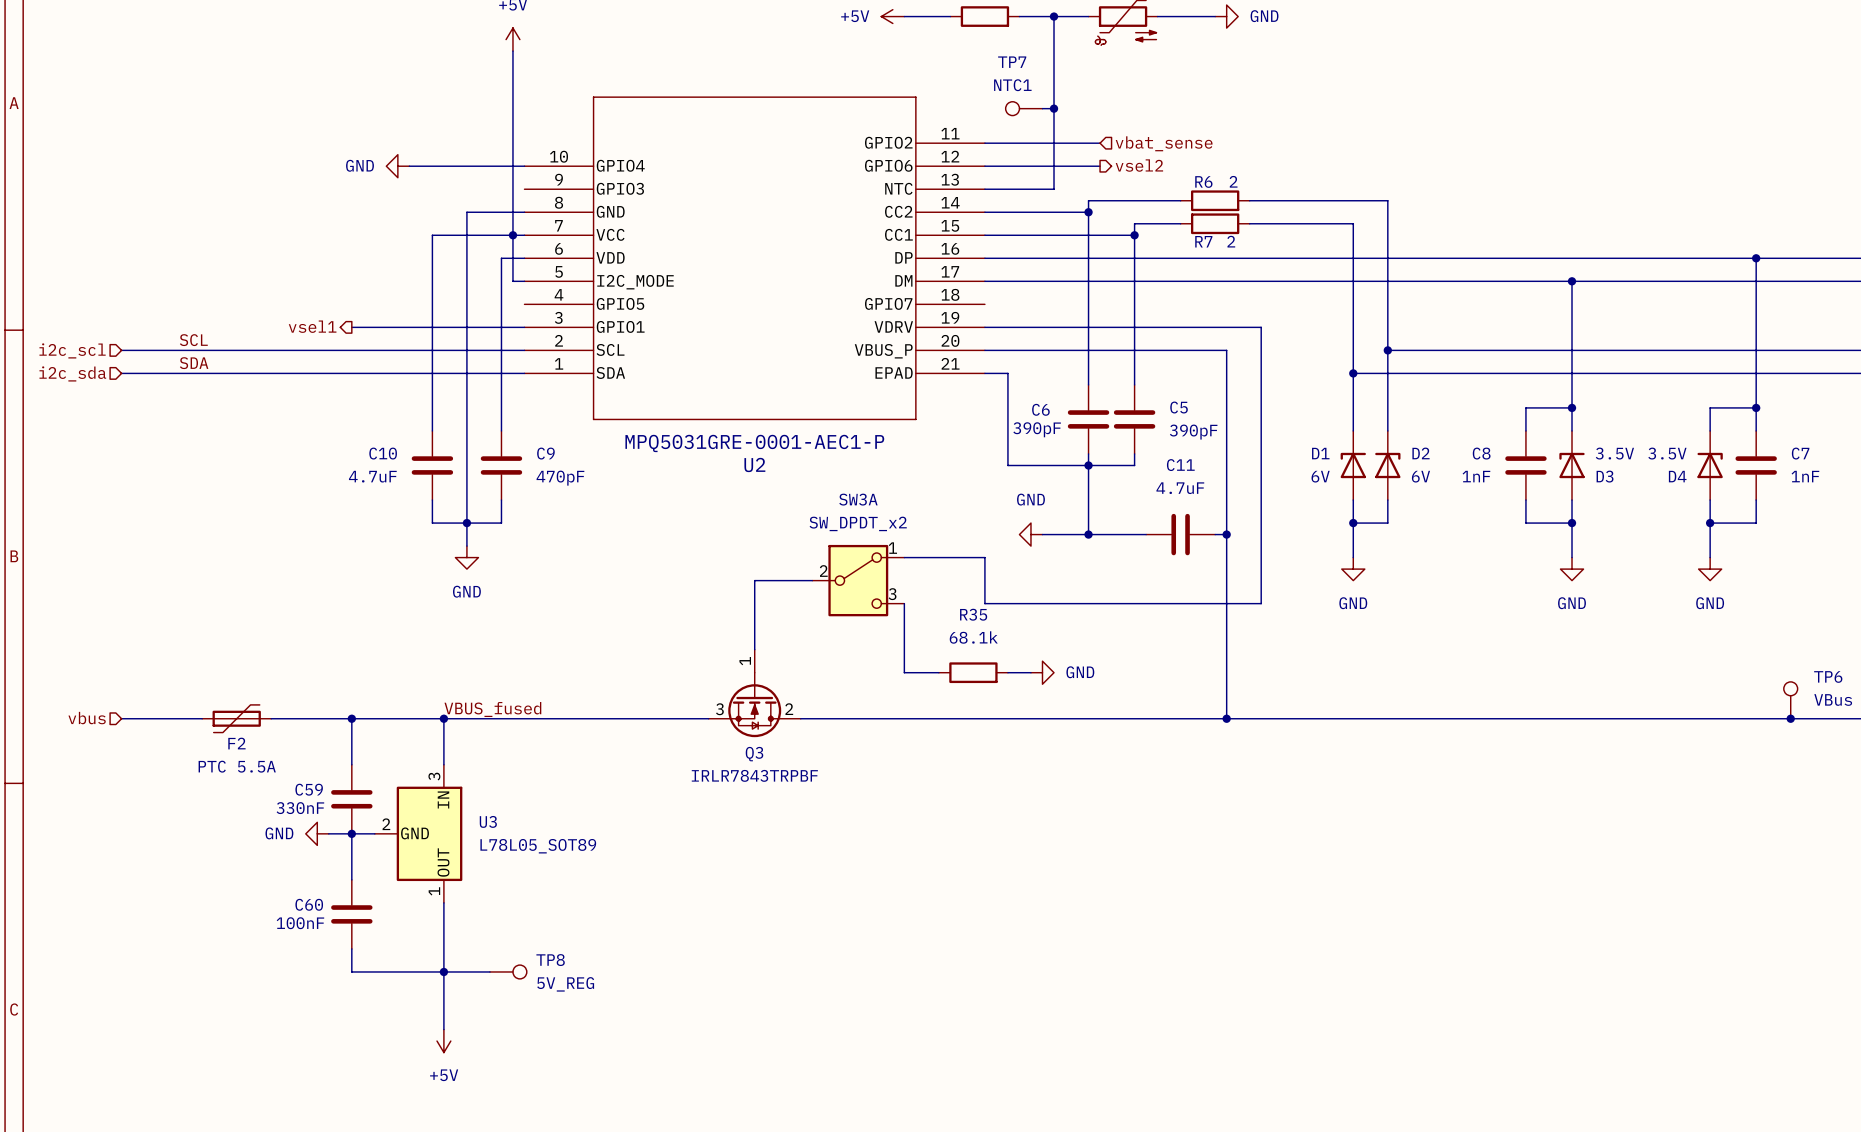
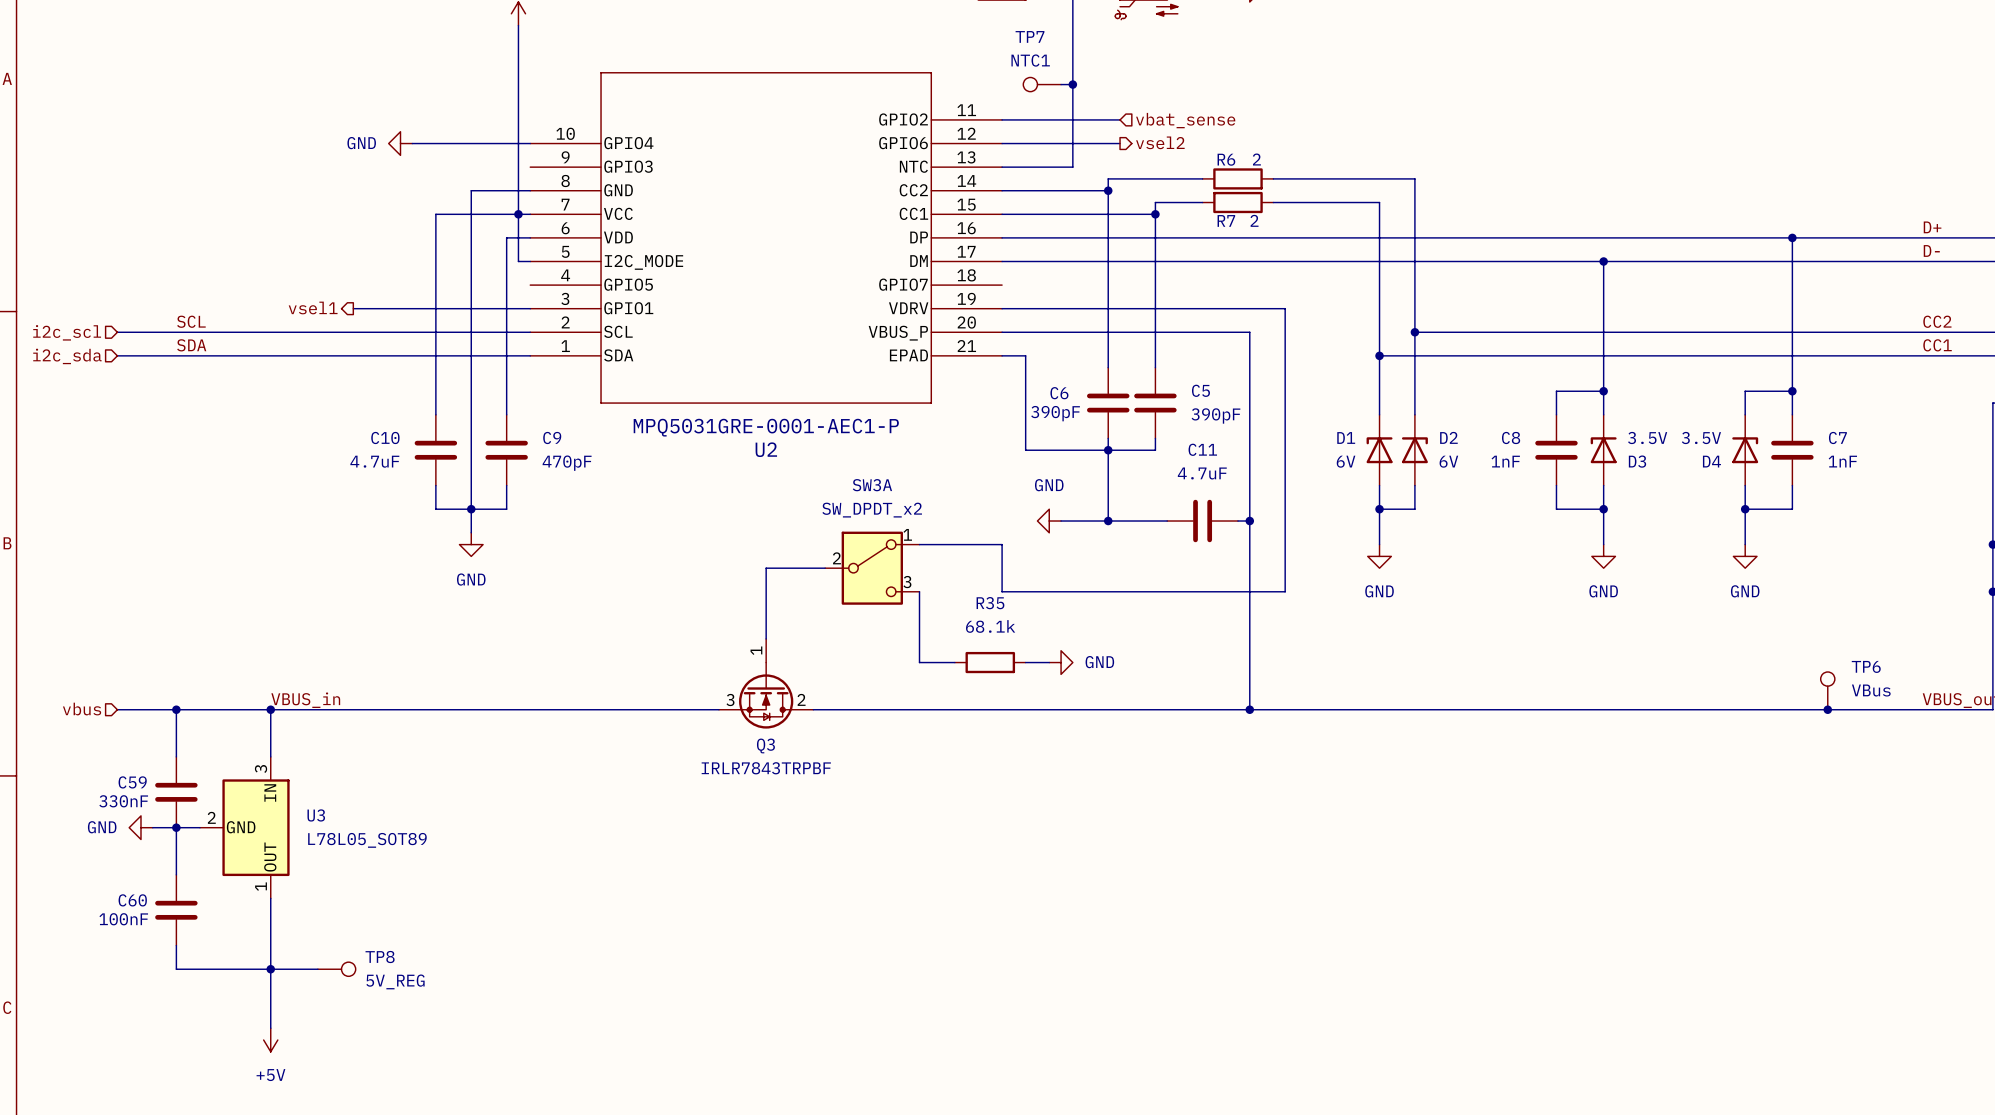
label: none -> VBUS_in (305, 700)
label: VBUS_fused (492, 709) -> none
junction: none -> (176, 709)
wire: none -> (199, 709) (270, 709) (270, 756)
F2: PTC 5.5A (236, 718) -> none
junction: none -> (270, 709)
wire: (351, 718) (351, 764) -> (176, 709) (176, 756)
junction: (351, 718) -> none
wire: (443, 718) (443, 764) -> none
junction: (443, 718) -> none
C59 position: (351, 799) -> (176, 792)
junction: none -> (176, 827)
power symbol position: GND (317, 833) -> GND (140, 827)
wire: (328, 833) (374, 833) -> (152, 827) (199, 827)
wire: (351, 833) (351, 879) -> (176, 827) (176, 874)
junction: (351, 833) -> none
U3 position: (418, 833) -> (244, 827)
wire: (443, 902) (443, 1029) -> (270, 898) (270, 1028)
C60 position: (351, 914) -> (176, 910)
wire: (351, 948) (351, 971) (489, 971) -> (176, 945) (176, 969) (317, 969)
junction: none -> (270, 969)
junction: (443, 971) -> none
TP8 position: (508, 971) -> (336, 969)
power symbol position: +5V (443, 1041) -> +5V (270, 1040)

